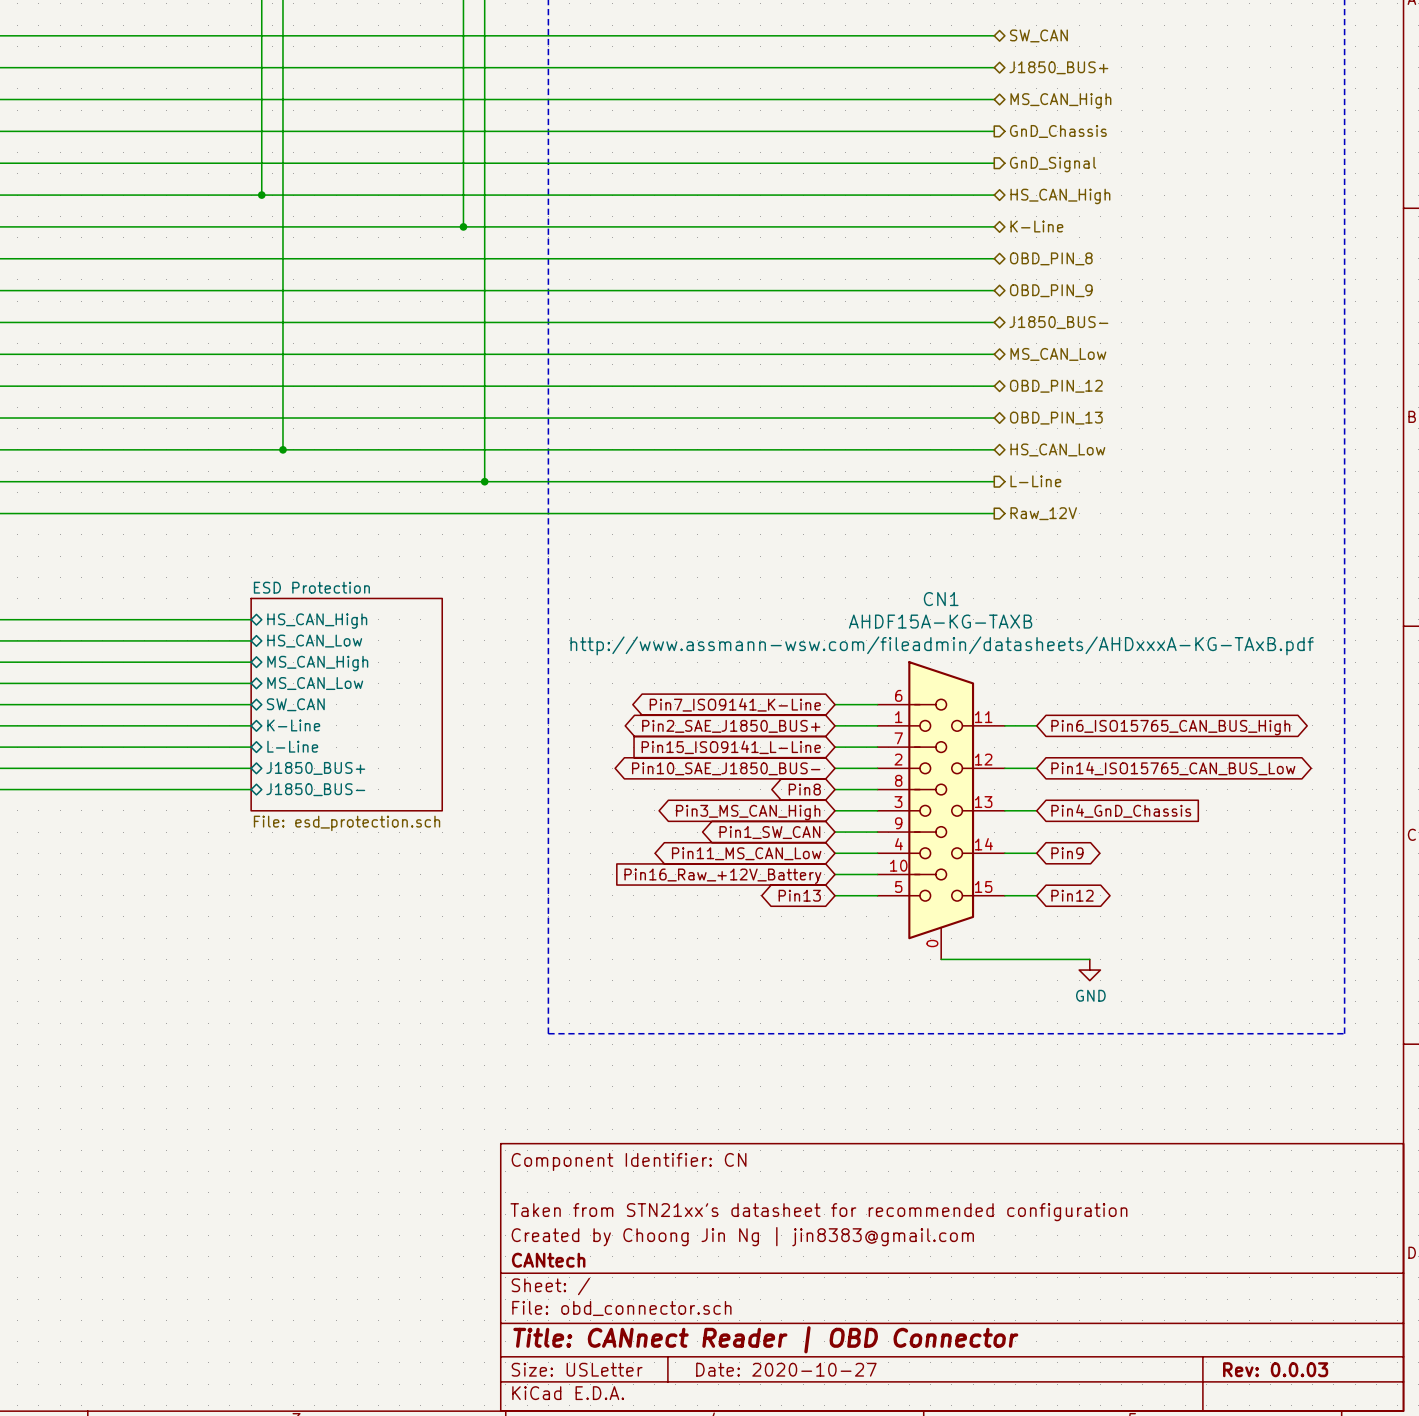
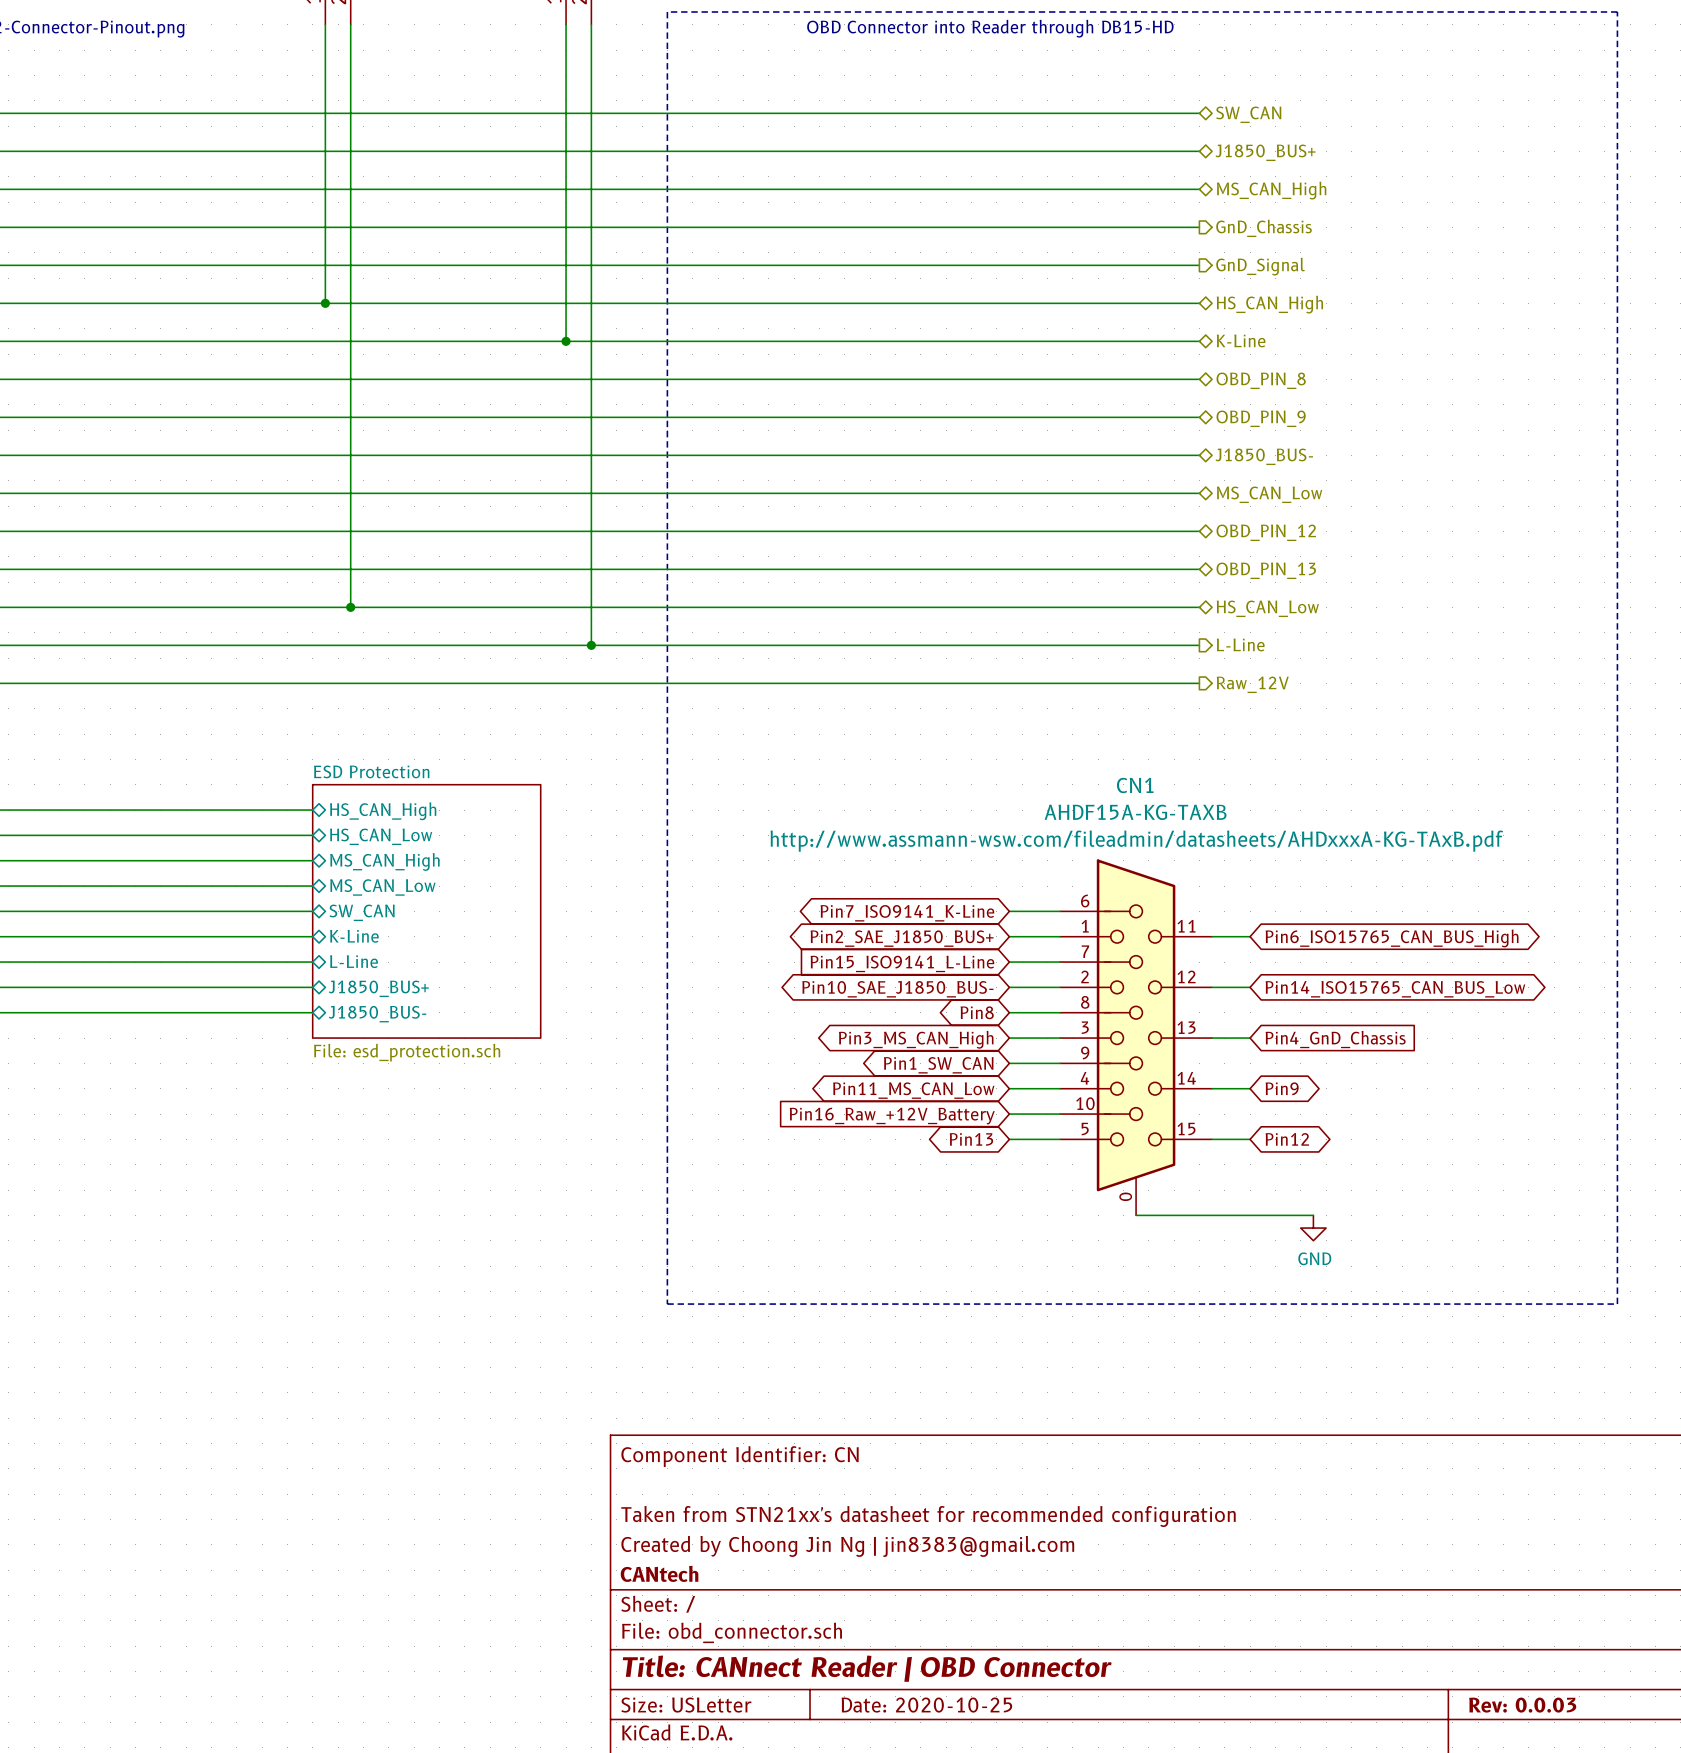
title block: Date: 2020-10-27 (786, 1369) -> Date: 2020-10-25 (926, 1705)

